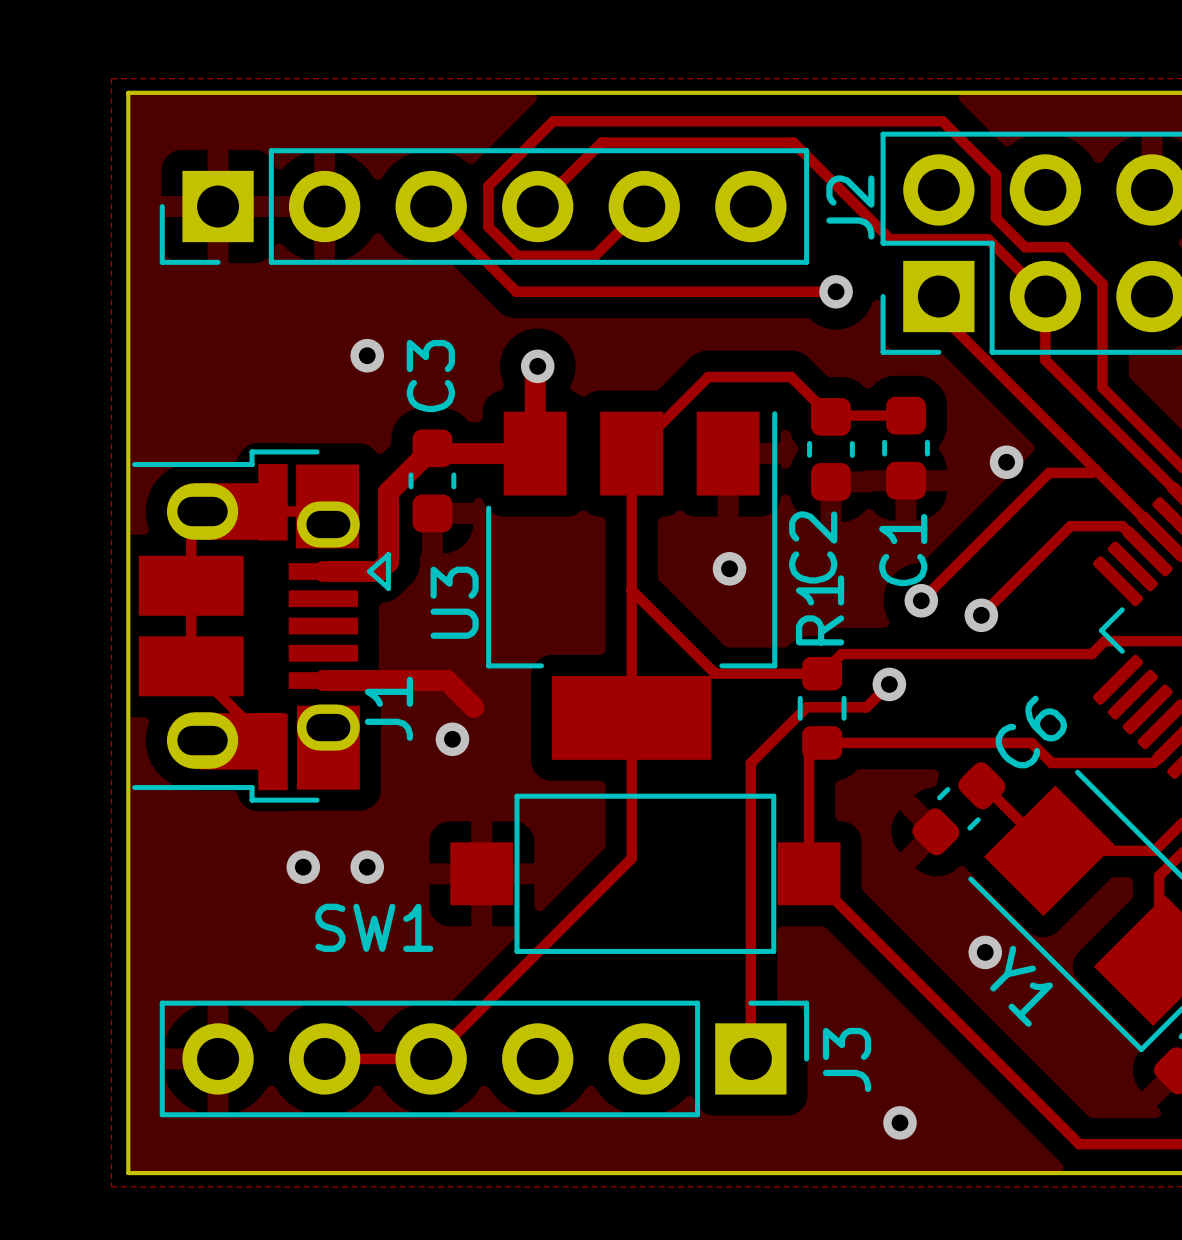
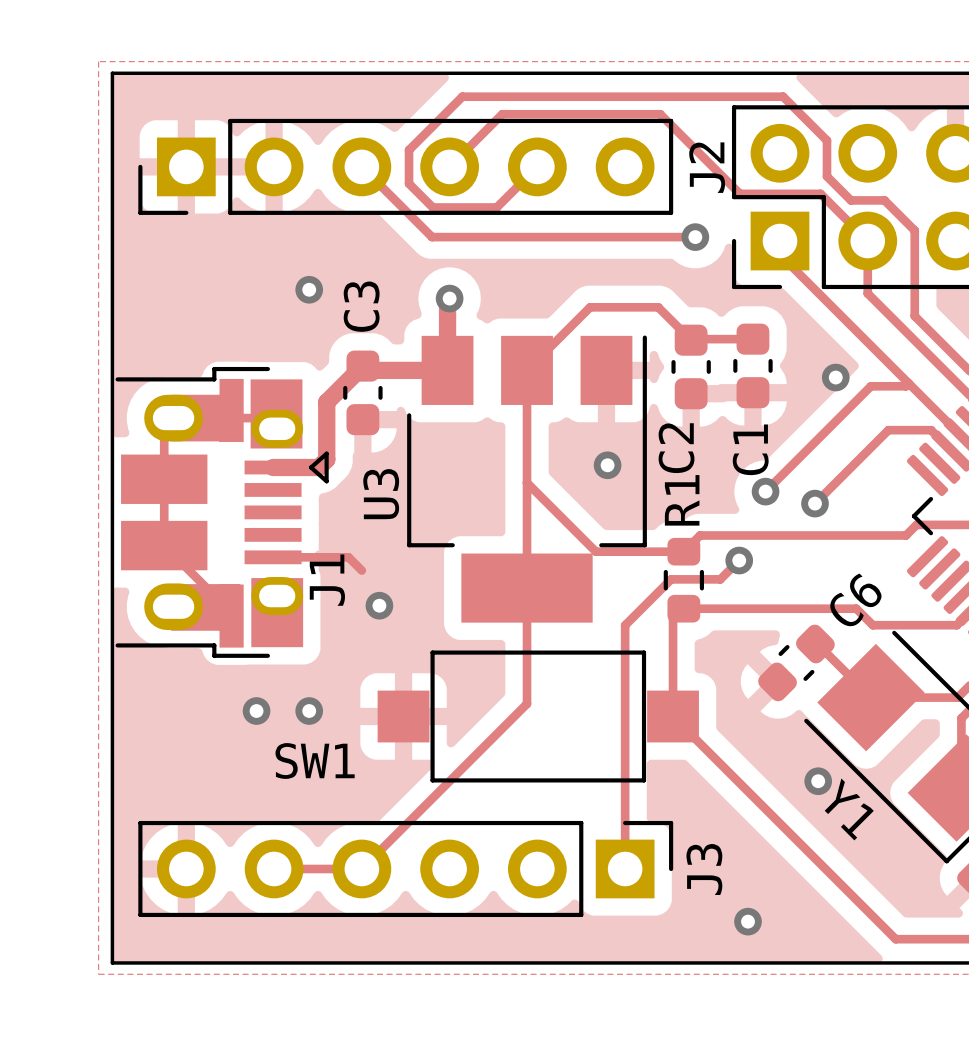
track width: thick (323, 680) (415, 680) -> thin (273, 557) (348, 557)
track: (415, 680) (447, 680) (473, 707) -> (348, 557) (361, 570)

